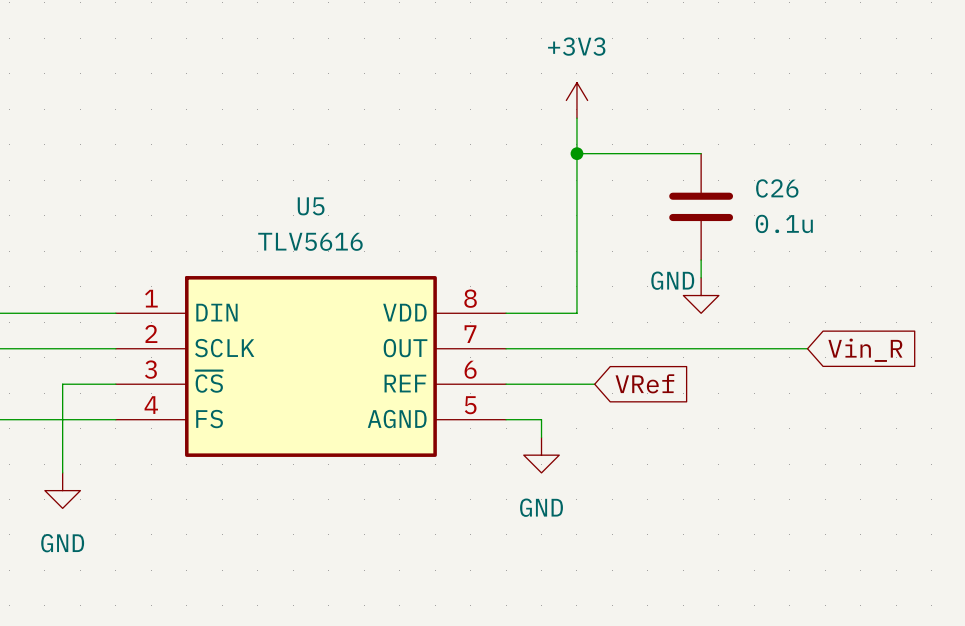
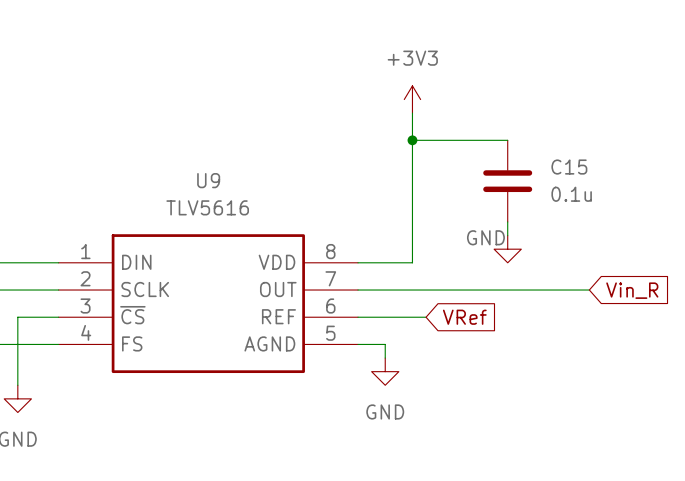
C26 name: C26 (777, 188) -> C15 (569, 167)
U5 name: U5 (311, 206) -> U9 (208, 180)

